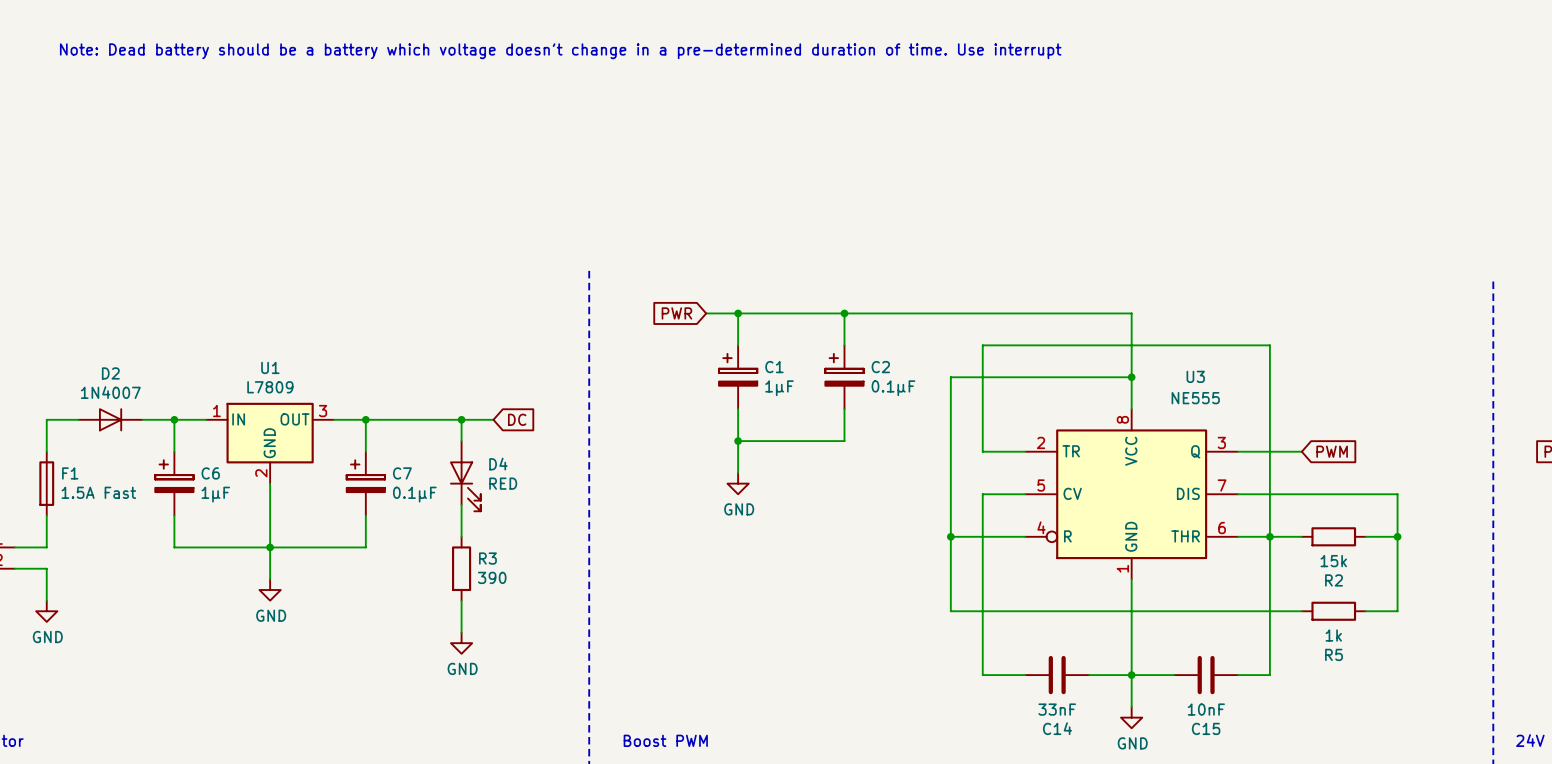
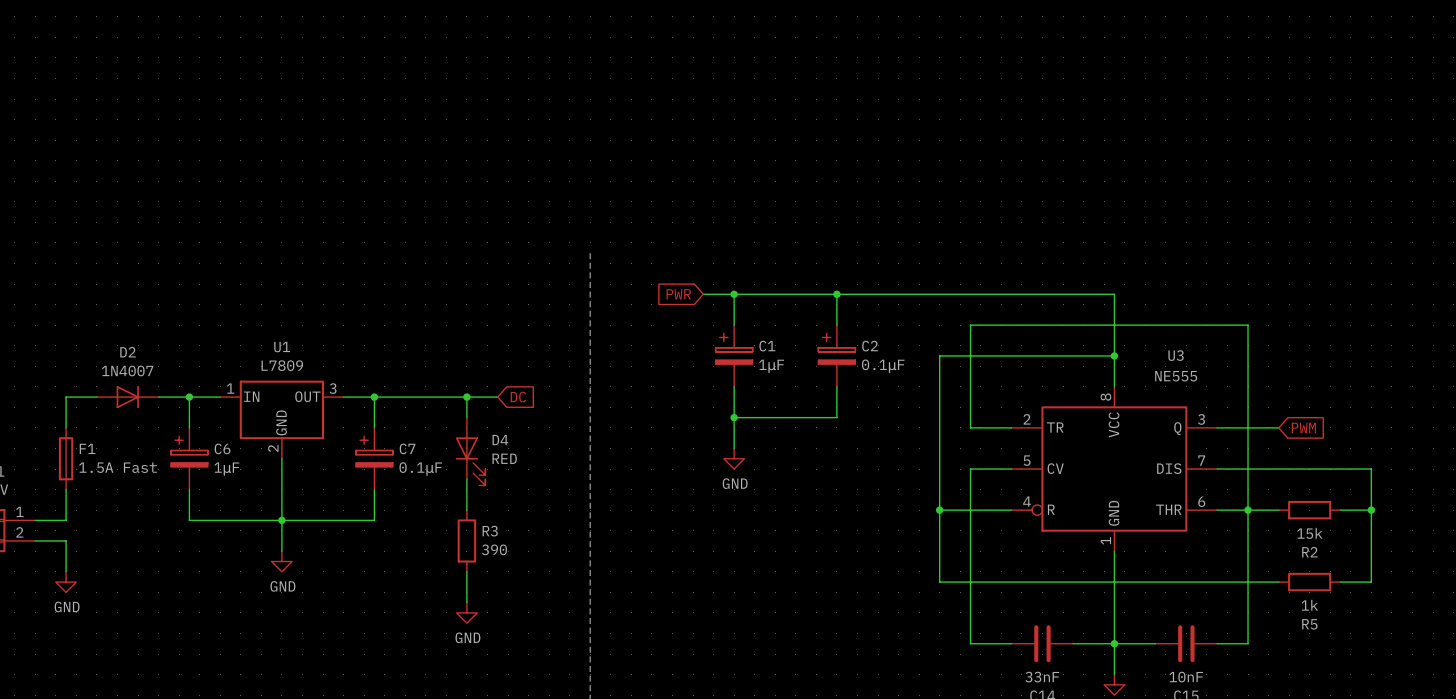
text: Note: Dead battery should be a battery which voltage doesn't change in a pre-determined duration of time. Use interrupt (560, 51) -> none

